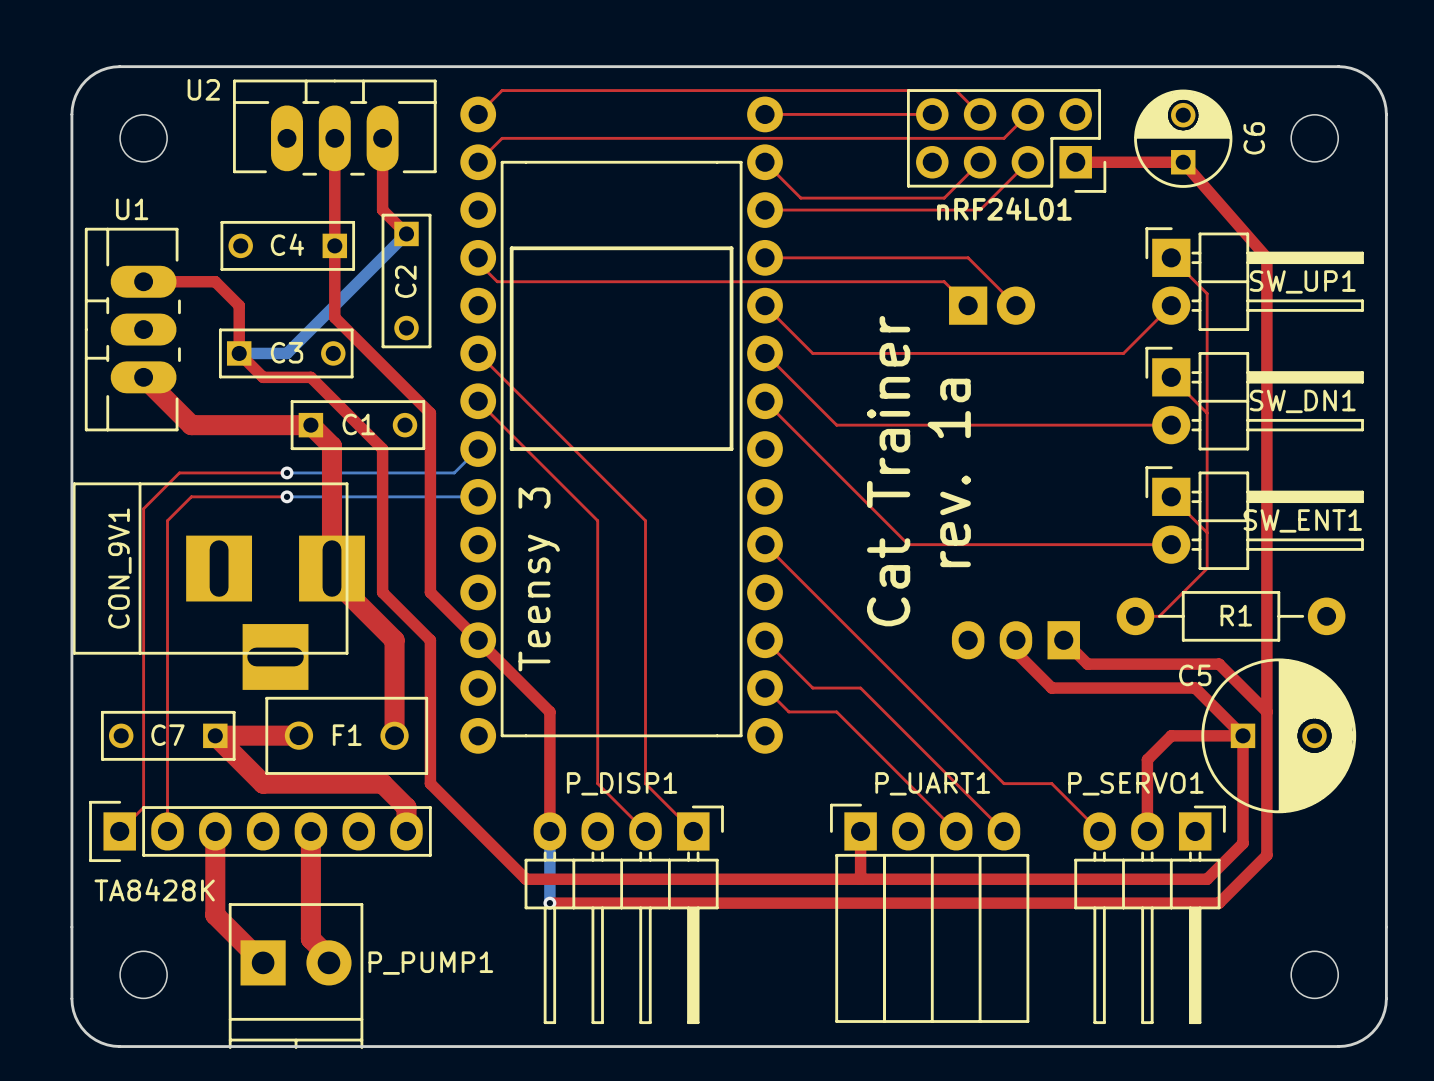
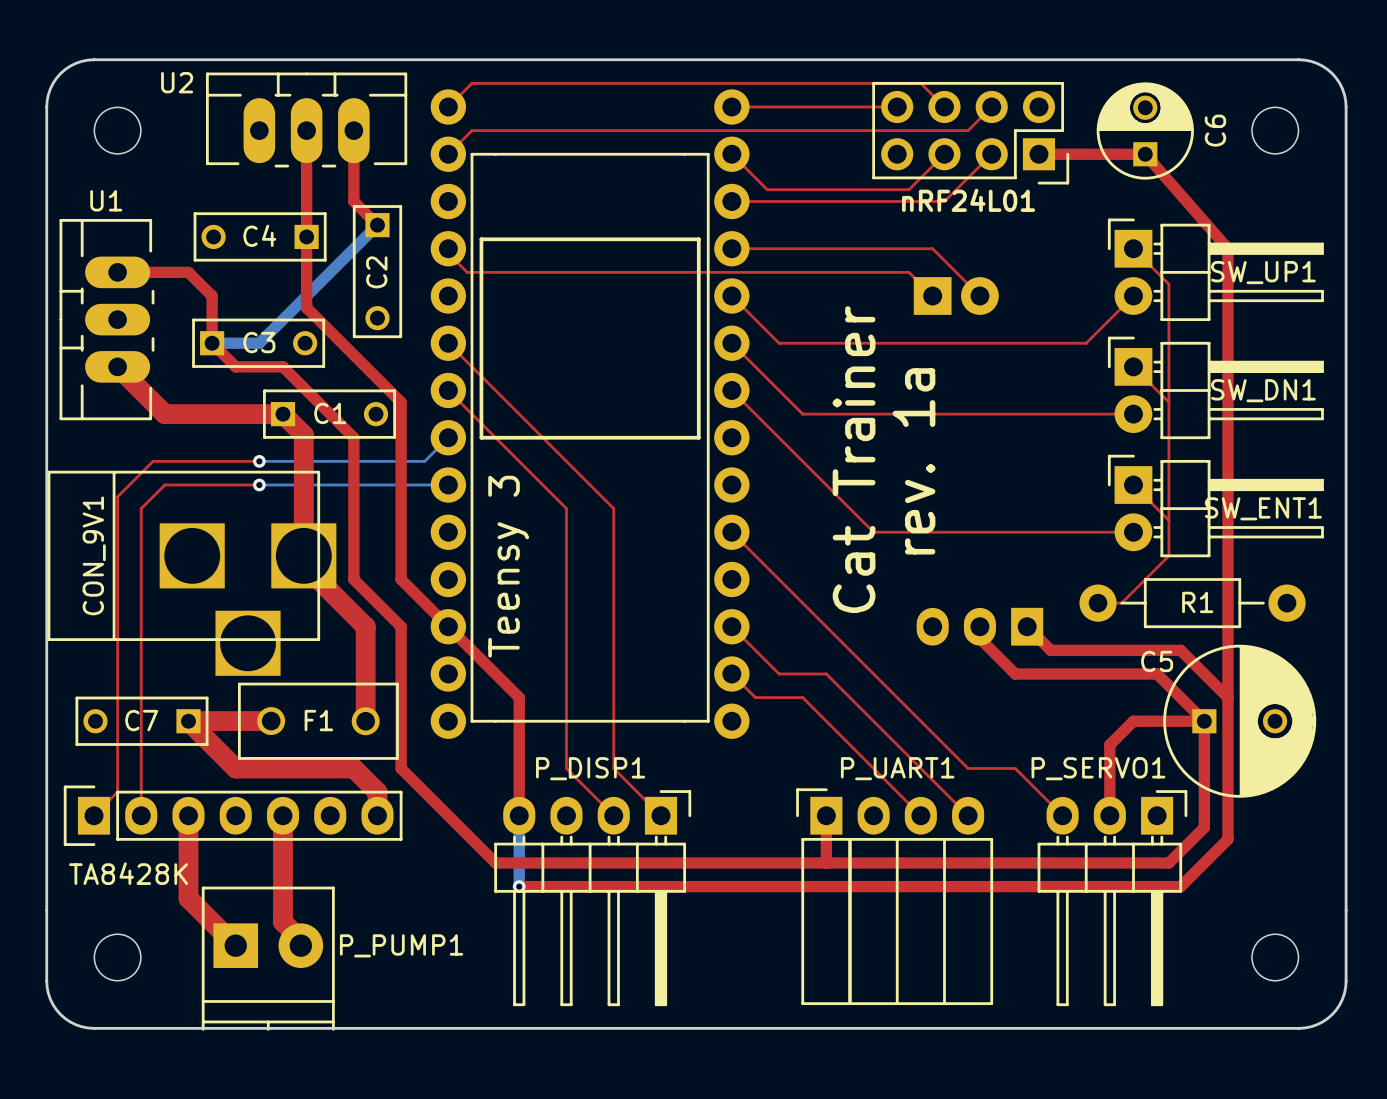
CON_9V1 footprint: [72, 482, 365, 690] -> [47, 470, 337, 676]

